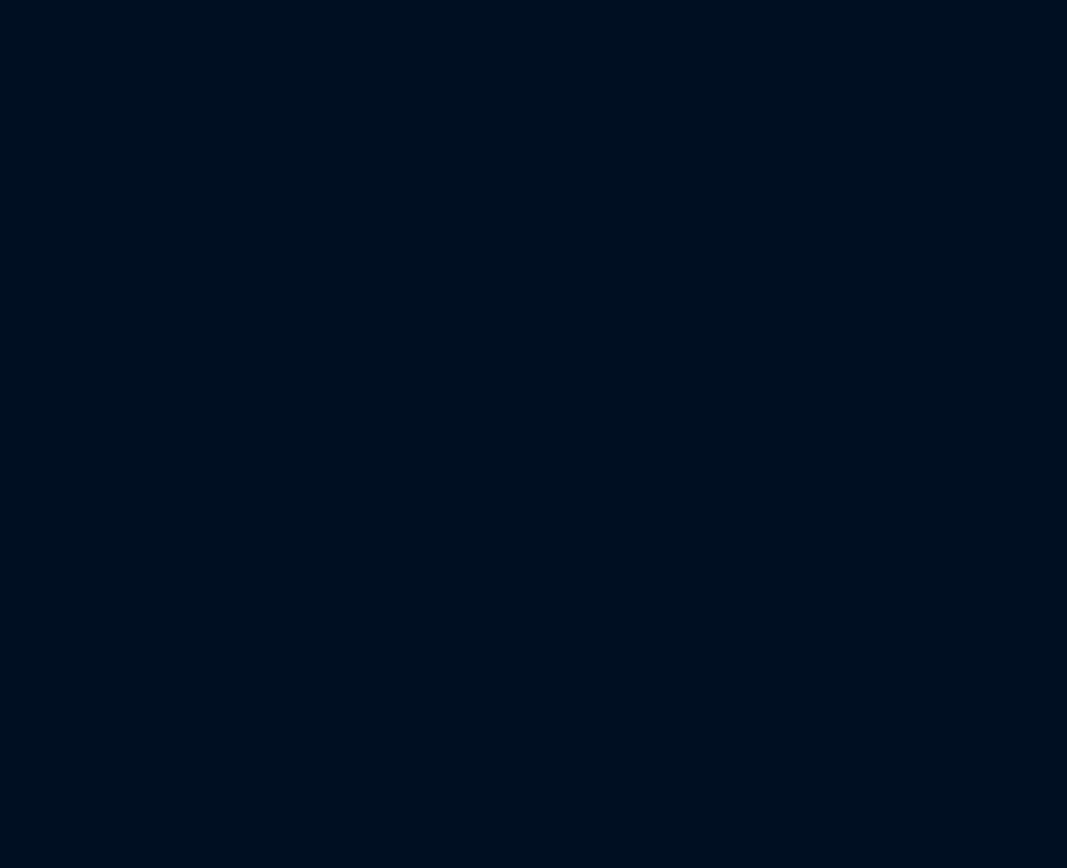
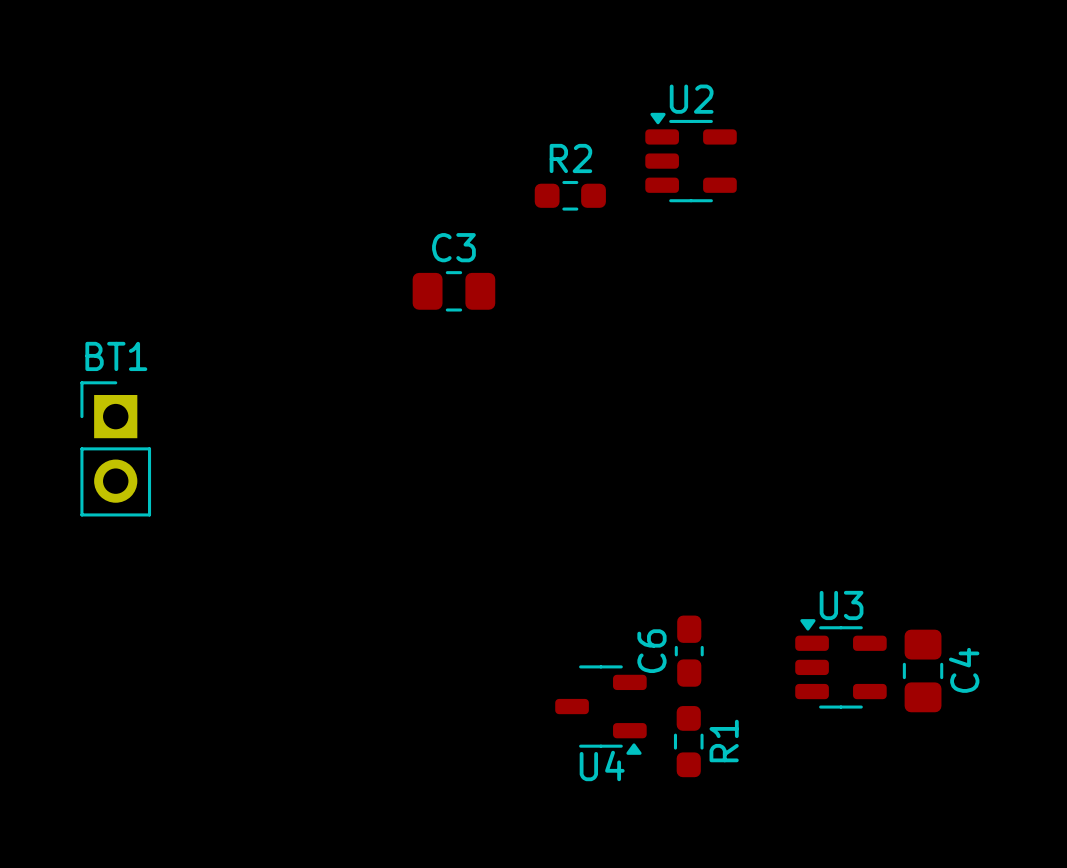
U2: none -> (691, 157)
R2: none -> (570, 195)
C3: none -> (453, 291)
BT1: none -> (115, 448)
C6: none -> (689, 651)
U3: none -> (840, 663)
C4: none -> (923, 670)
U4: none -> (600, 710)
R1: none -> (688, 741)

